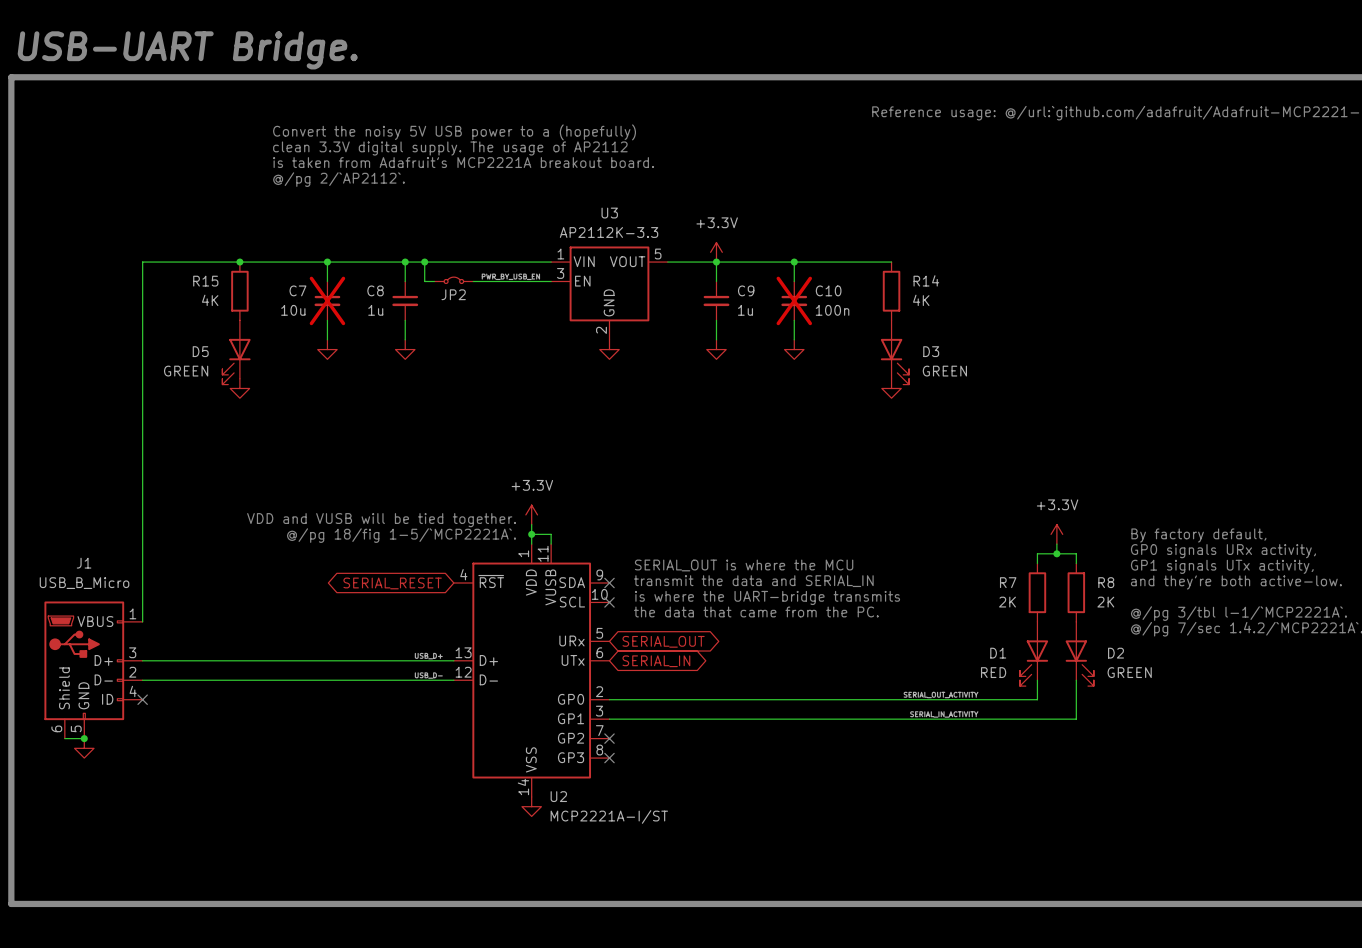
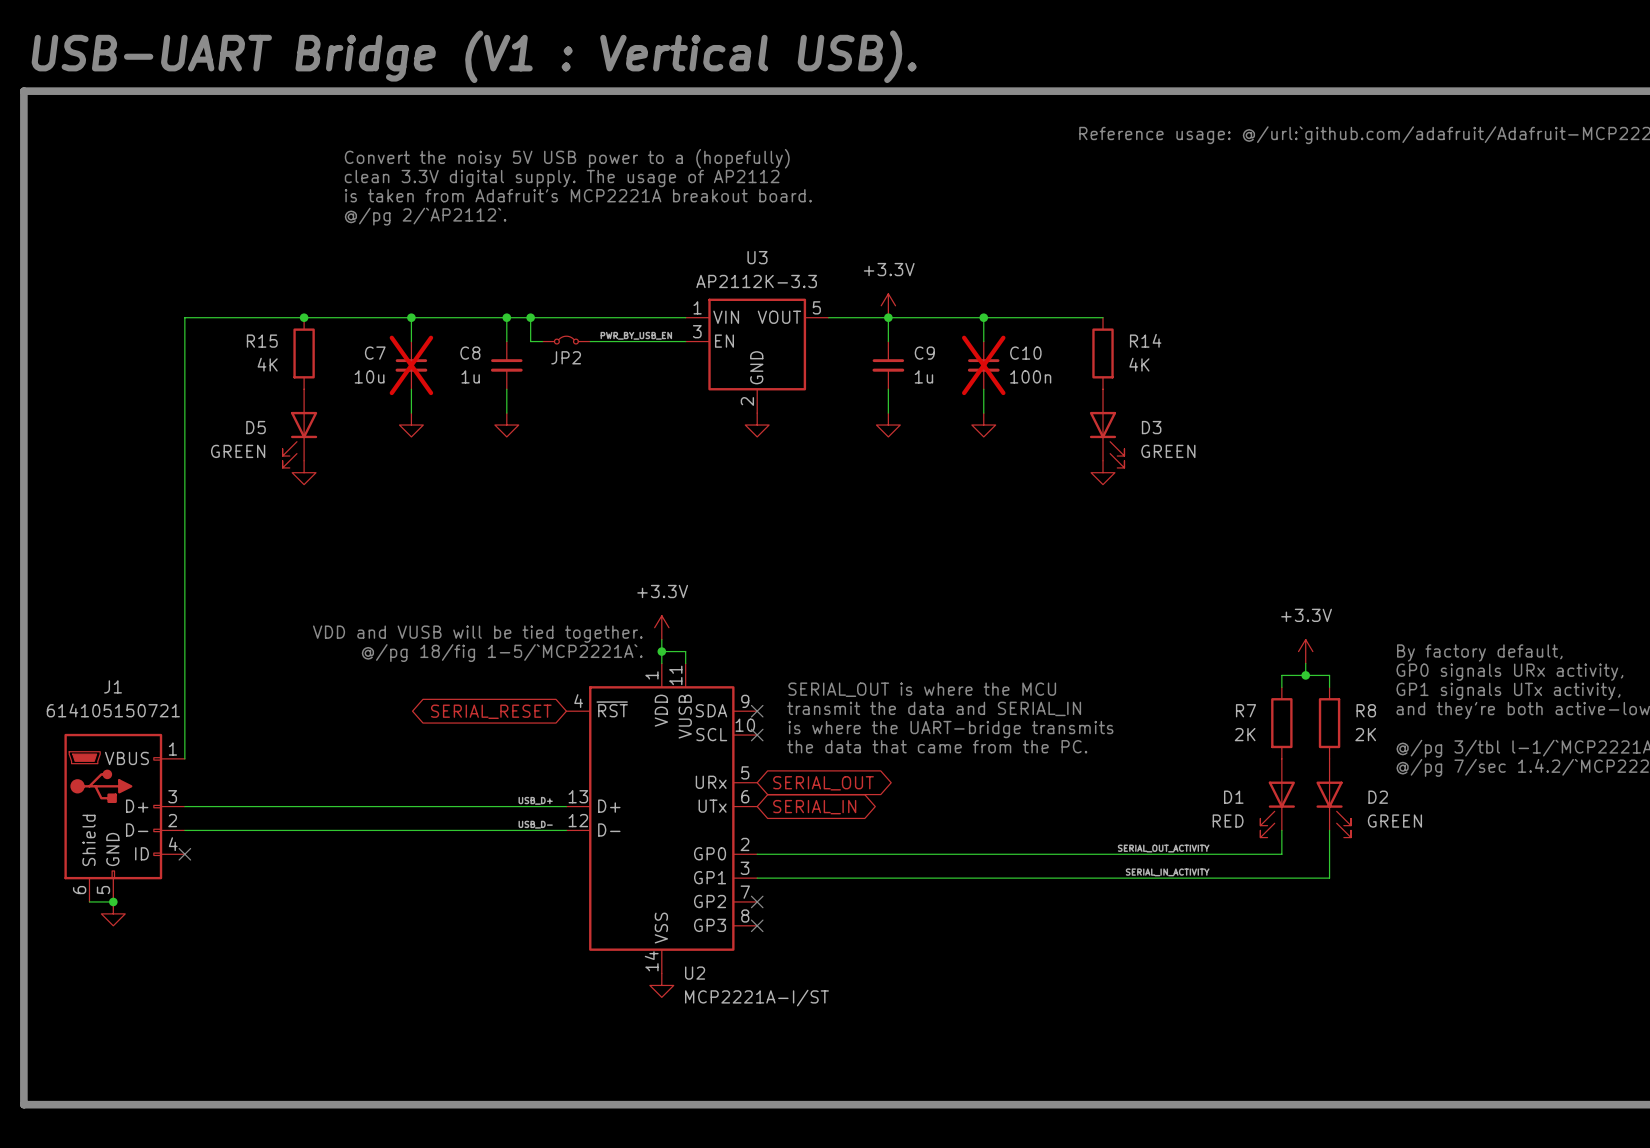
text: USB-UART Bridge. (187, 50) -> USB-UART Bridge (V1 : Vertical USB). (474, 56)
J1 value: USB_B_Micro (84, 583) -> 614105150721 (113, 710)

